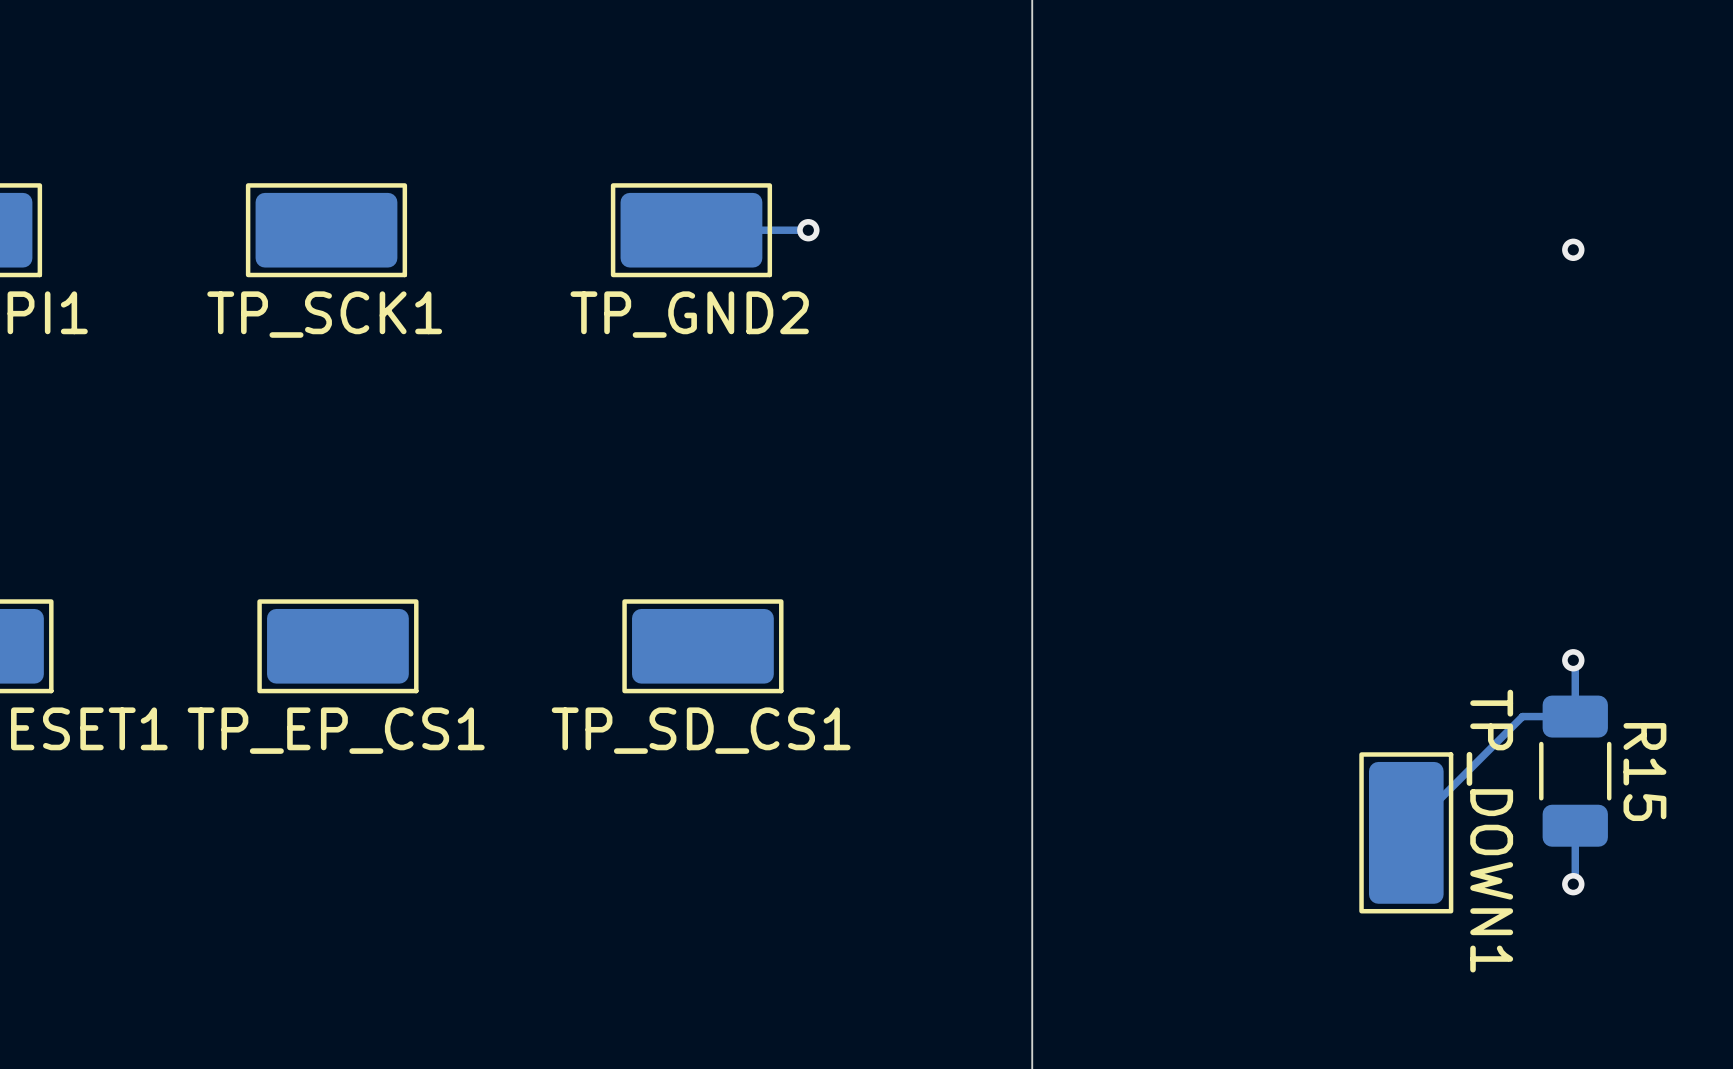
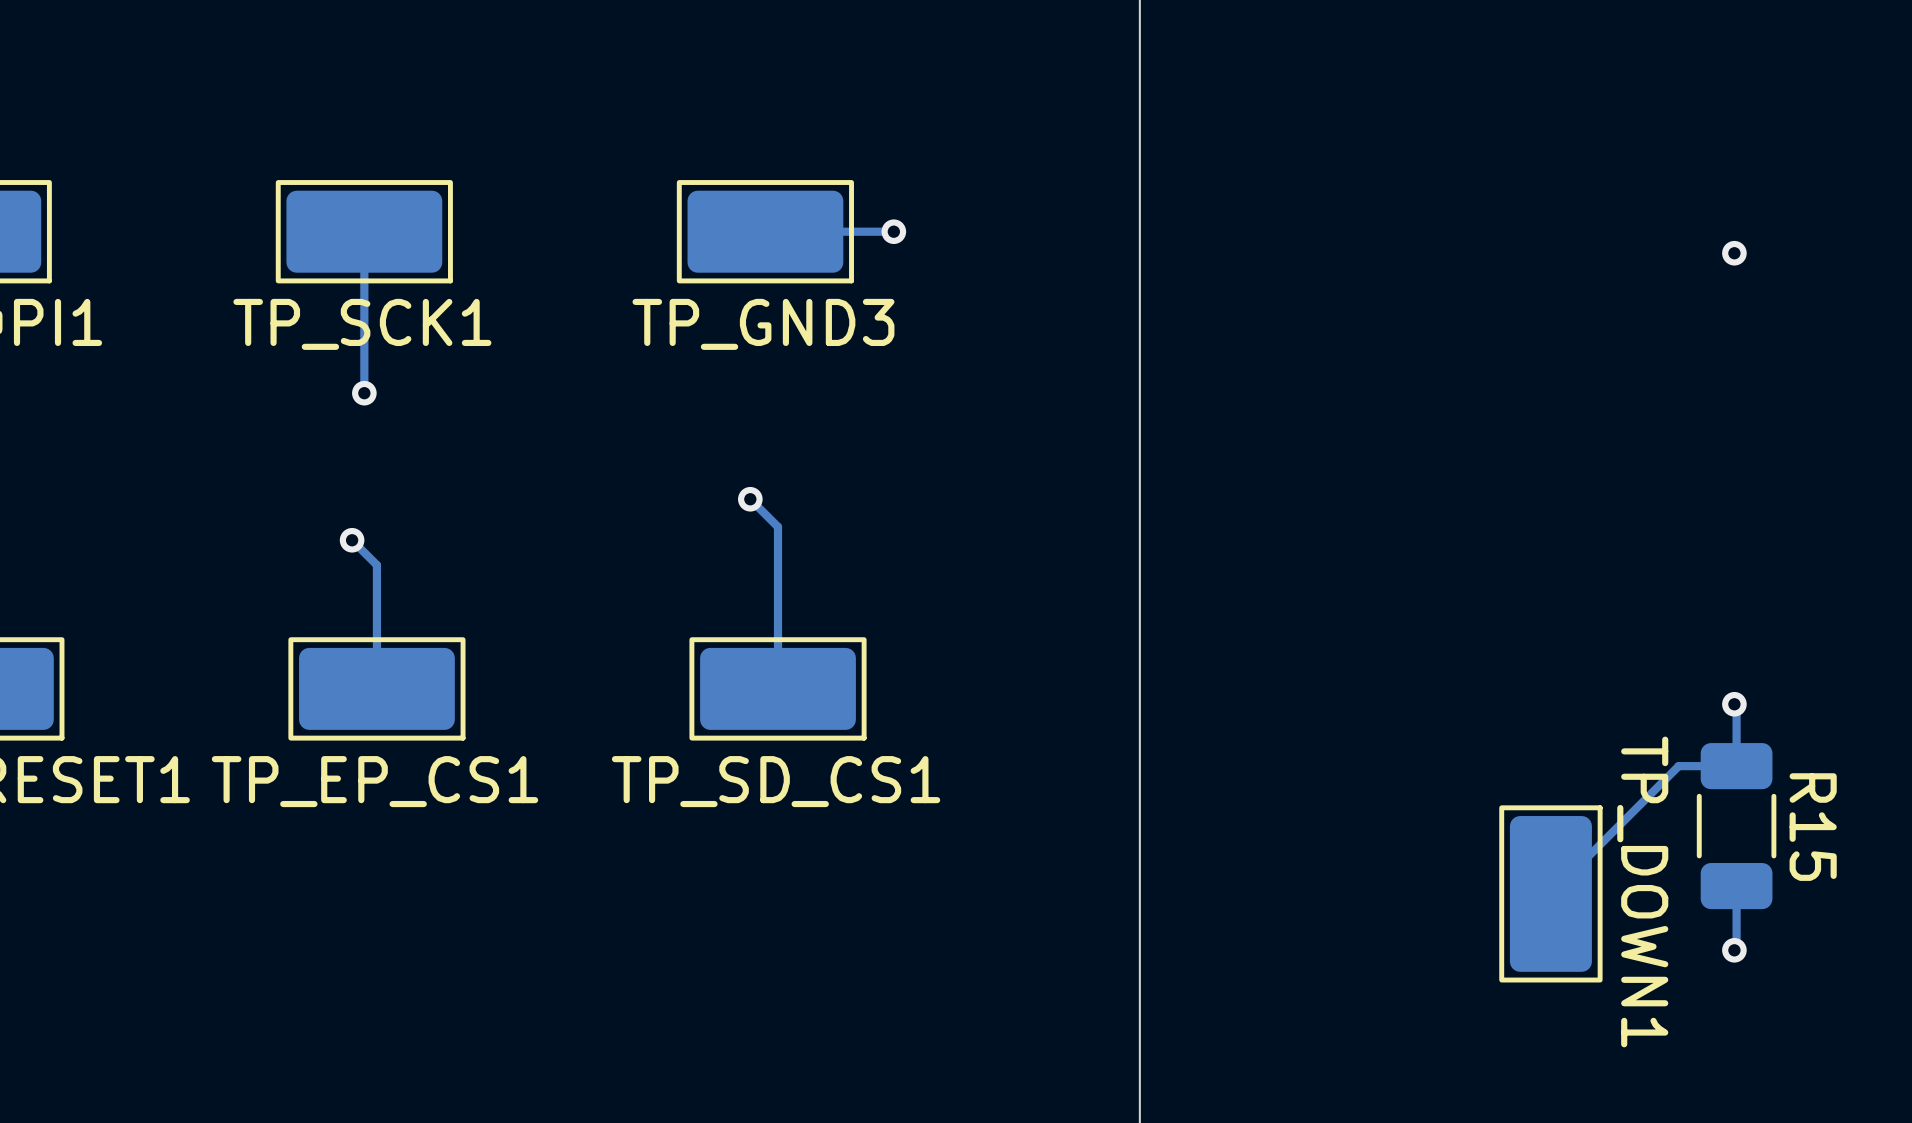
track: none -> (364, 231) (364, 393)
TP_GND2 name: TP_GND2 (689, 314) -> TP_GND3 (763, 324)
via: none -> (364, 393)
track: none -> (750, 499) (778, 526) (778, 688)
via: none -> (750, 499)
track: none -> (352, 540) (376, 565) (376, 688)
via: none -> (352, 540)

